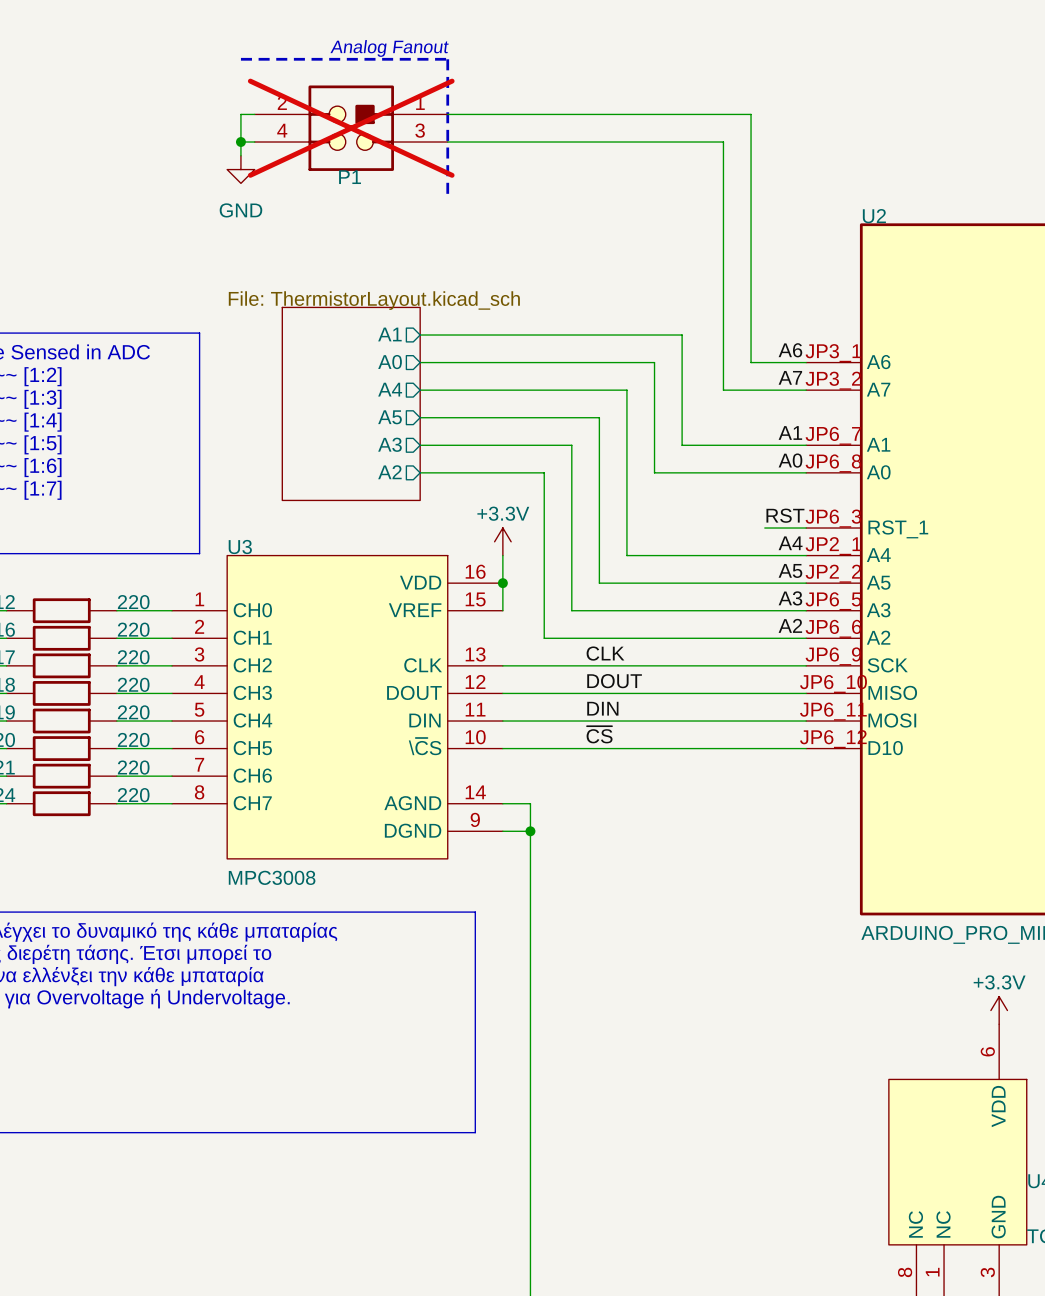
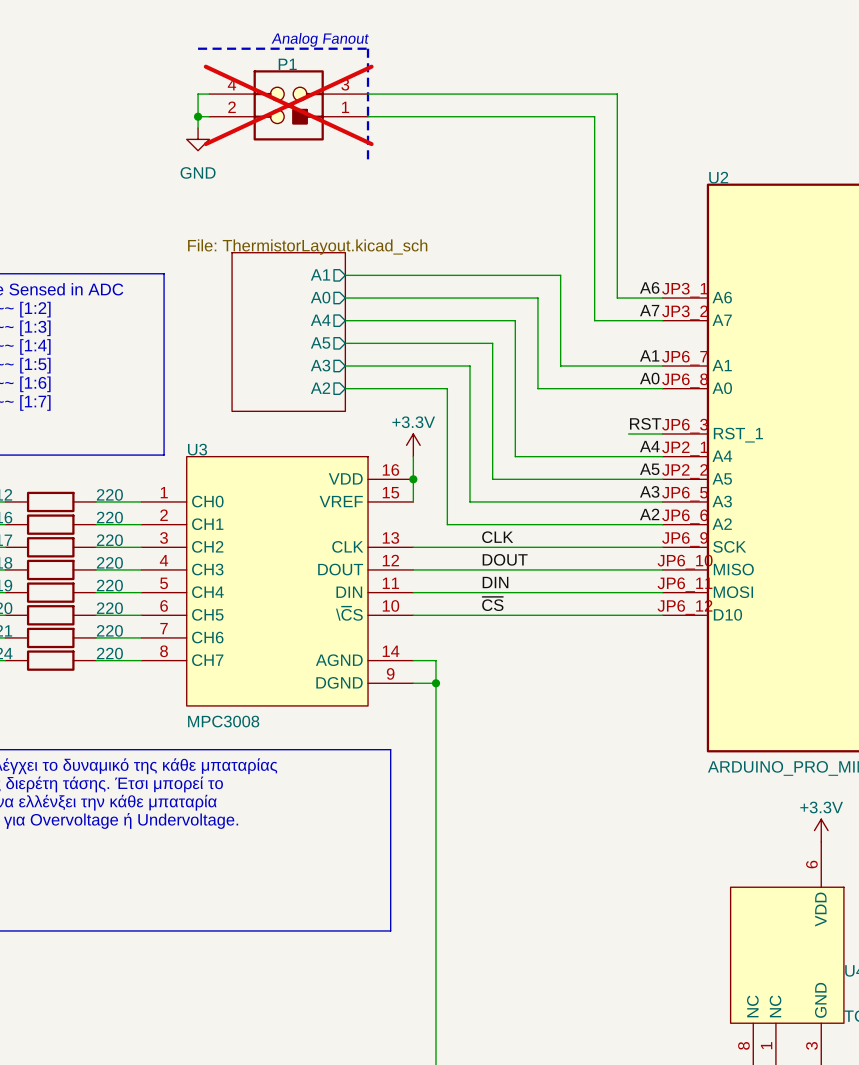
P1 flip: as is (351, 128) -> up-down (288, 105)

